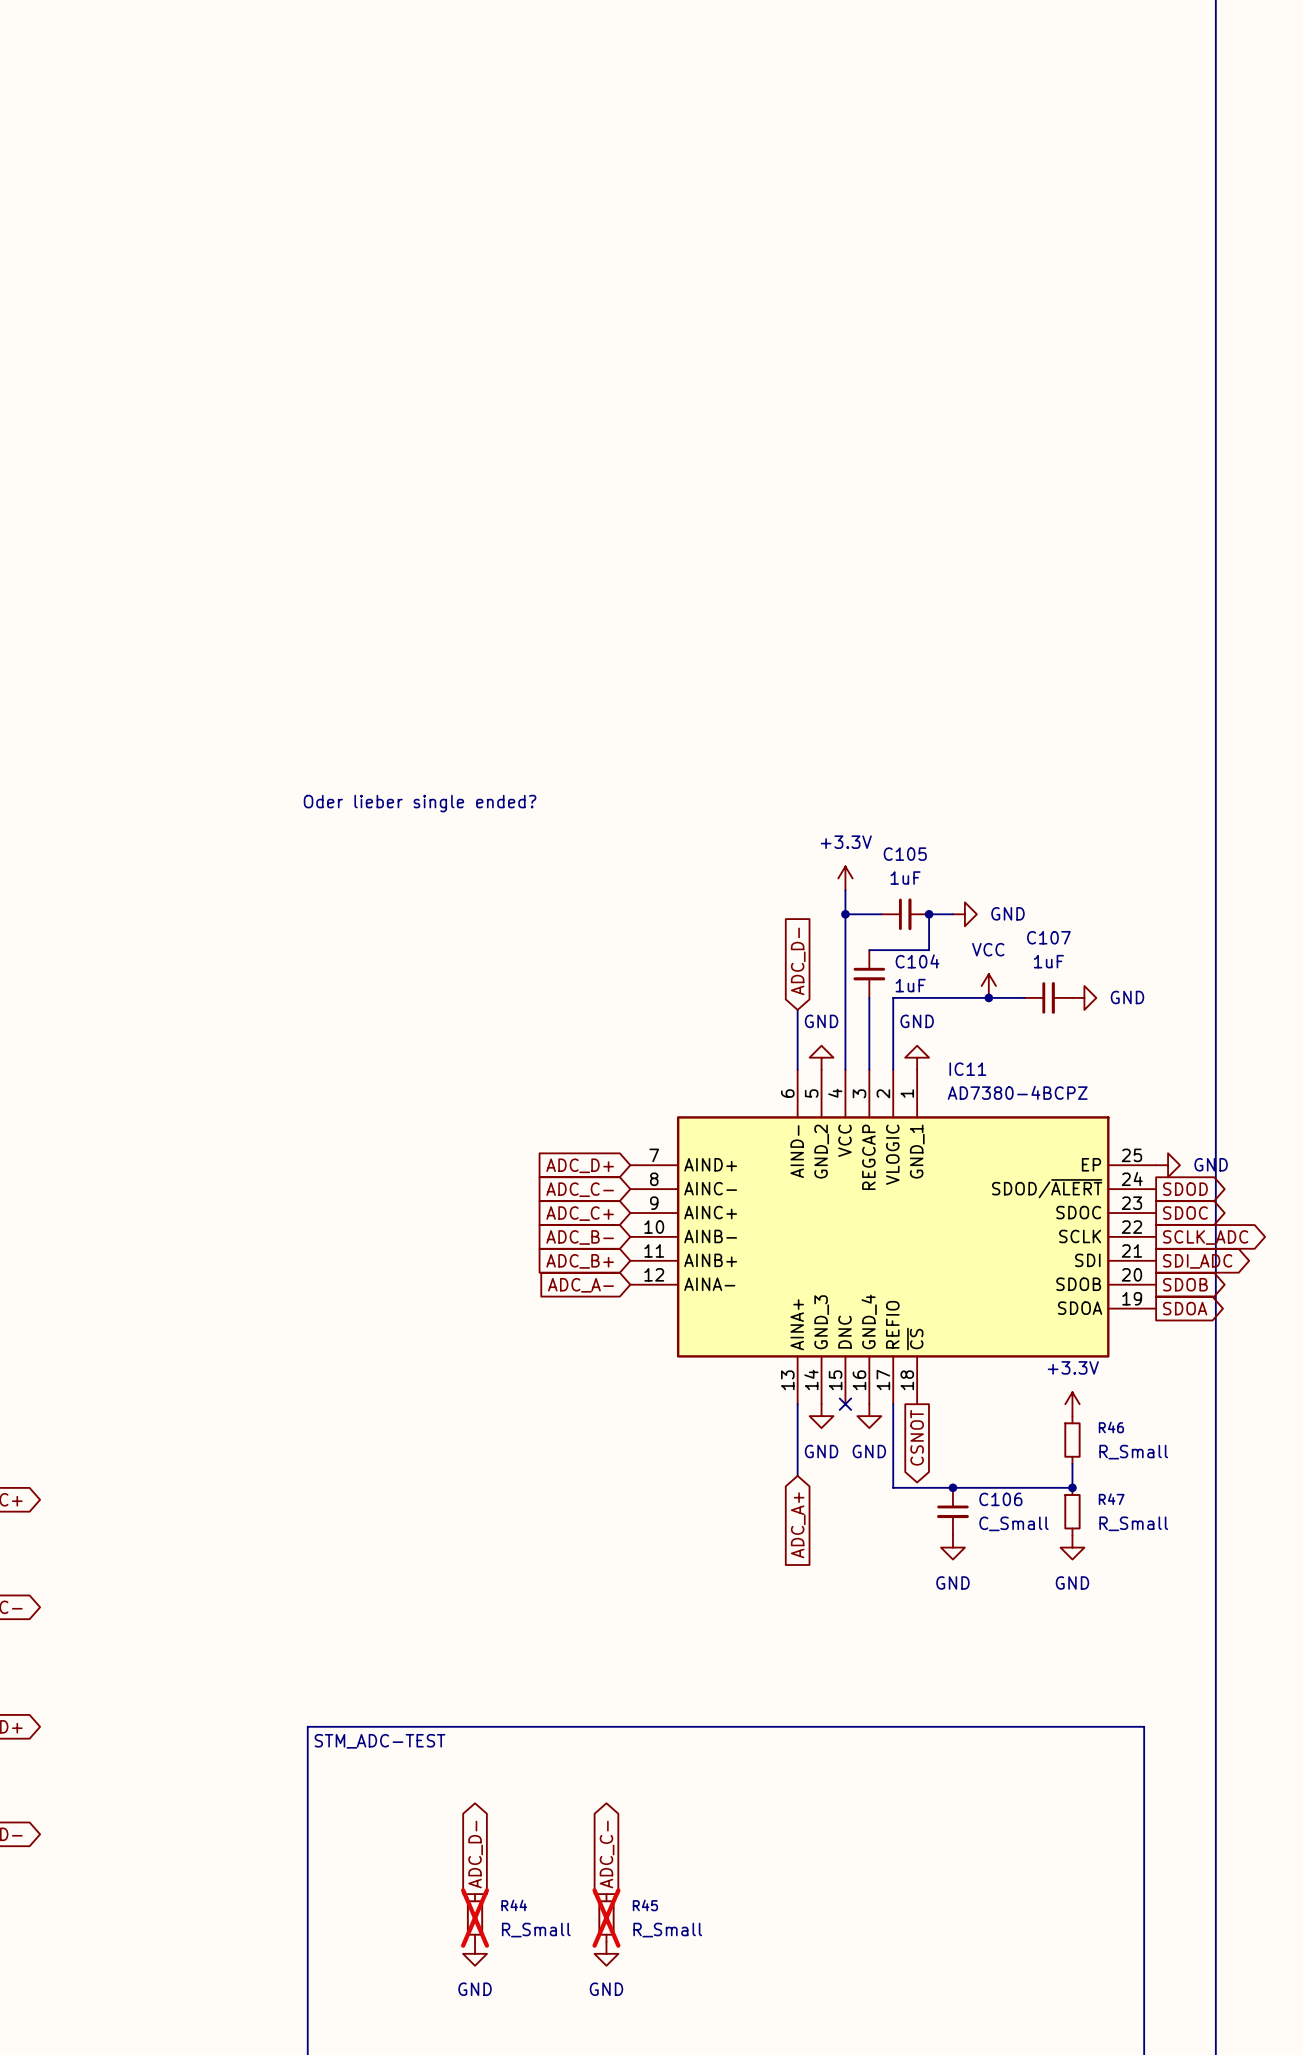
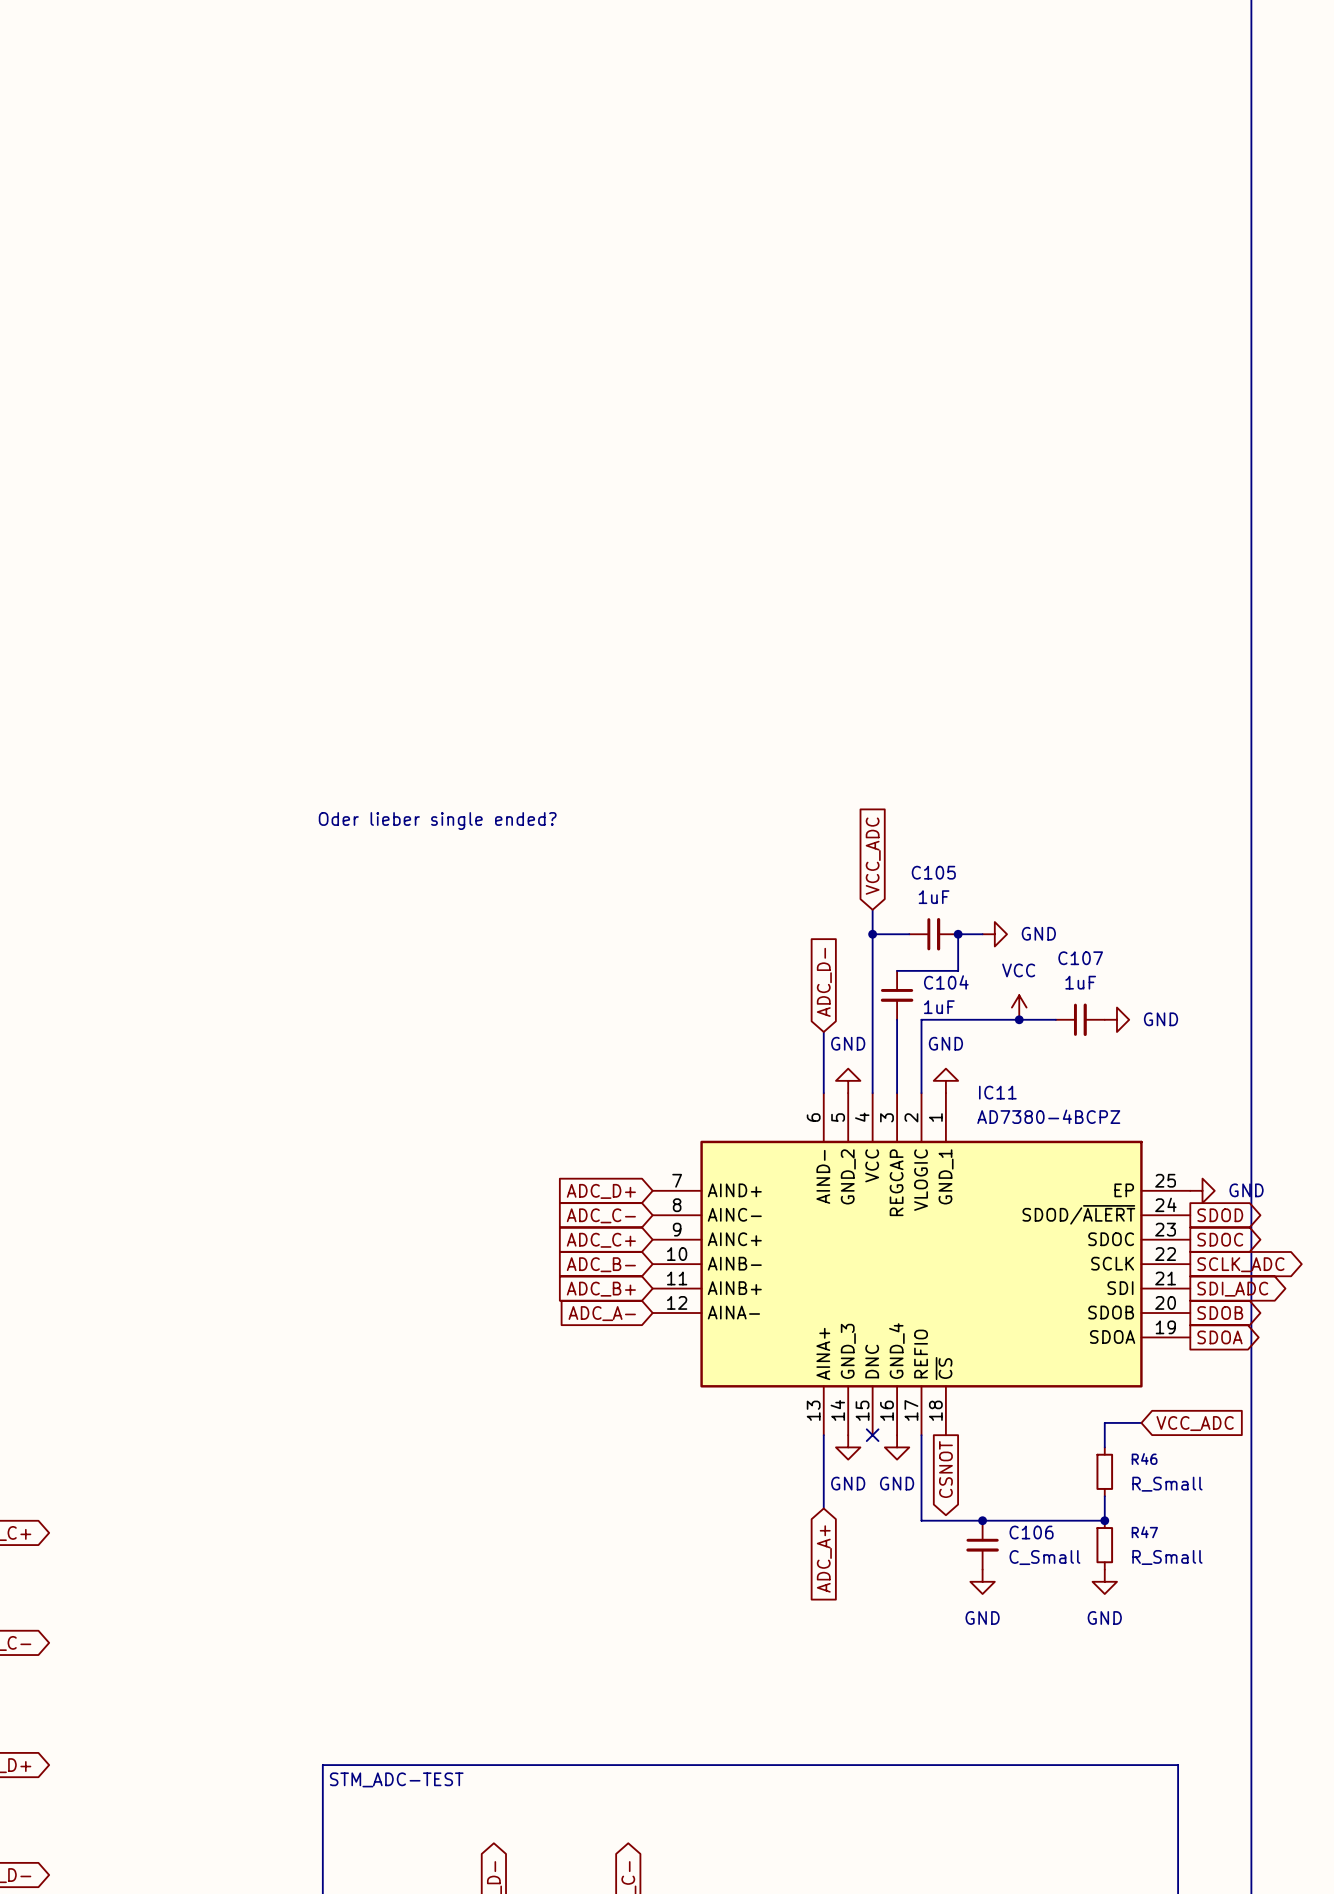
global label: none -> VCC_ADC (873, 856)
power symbol: +3.3V (845, 878) -> none
wire: none -> (1141, 1422) (1104, 1422) (1104, 1447)
global label: none -> VCC_ADC (1195, 1423)
power symbol: +3.3V (1072, 1404) -> none

